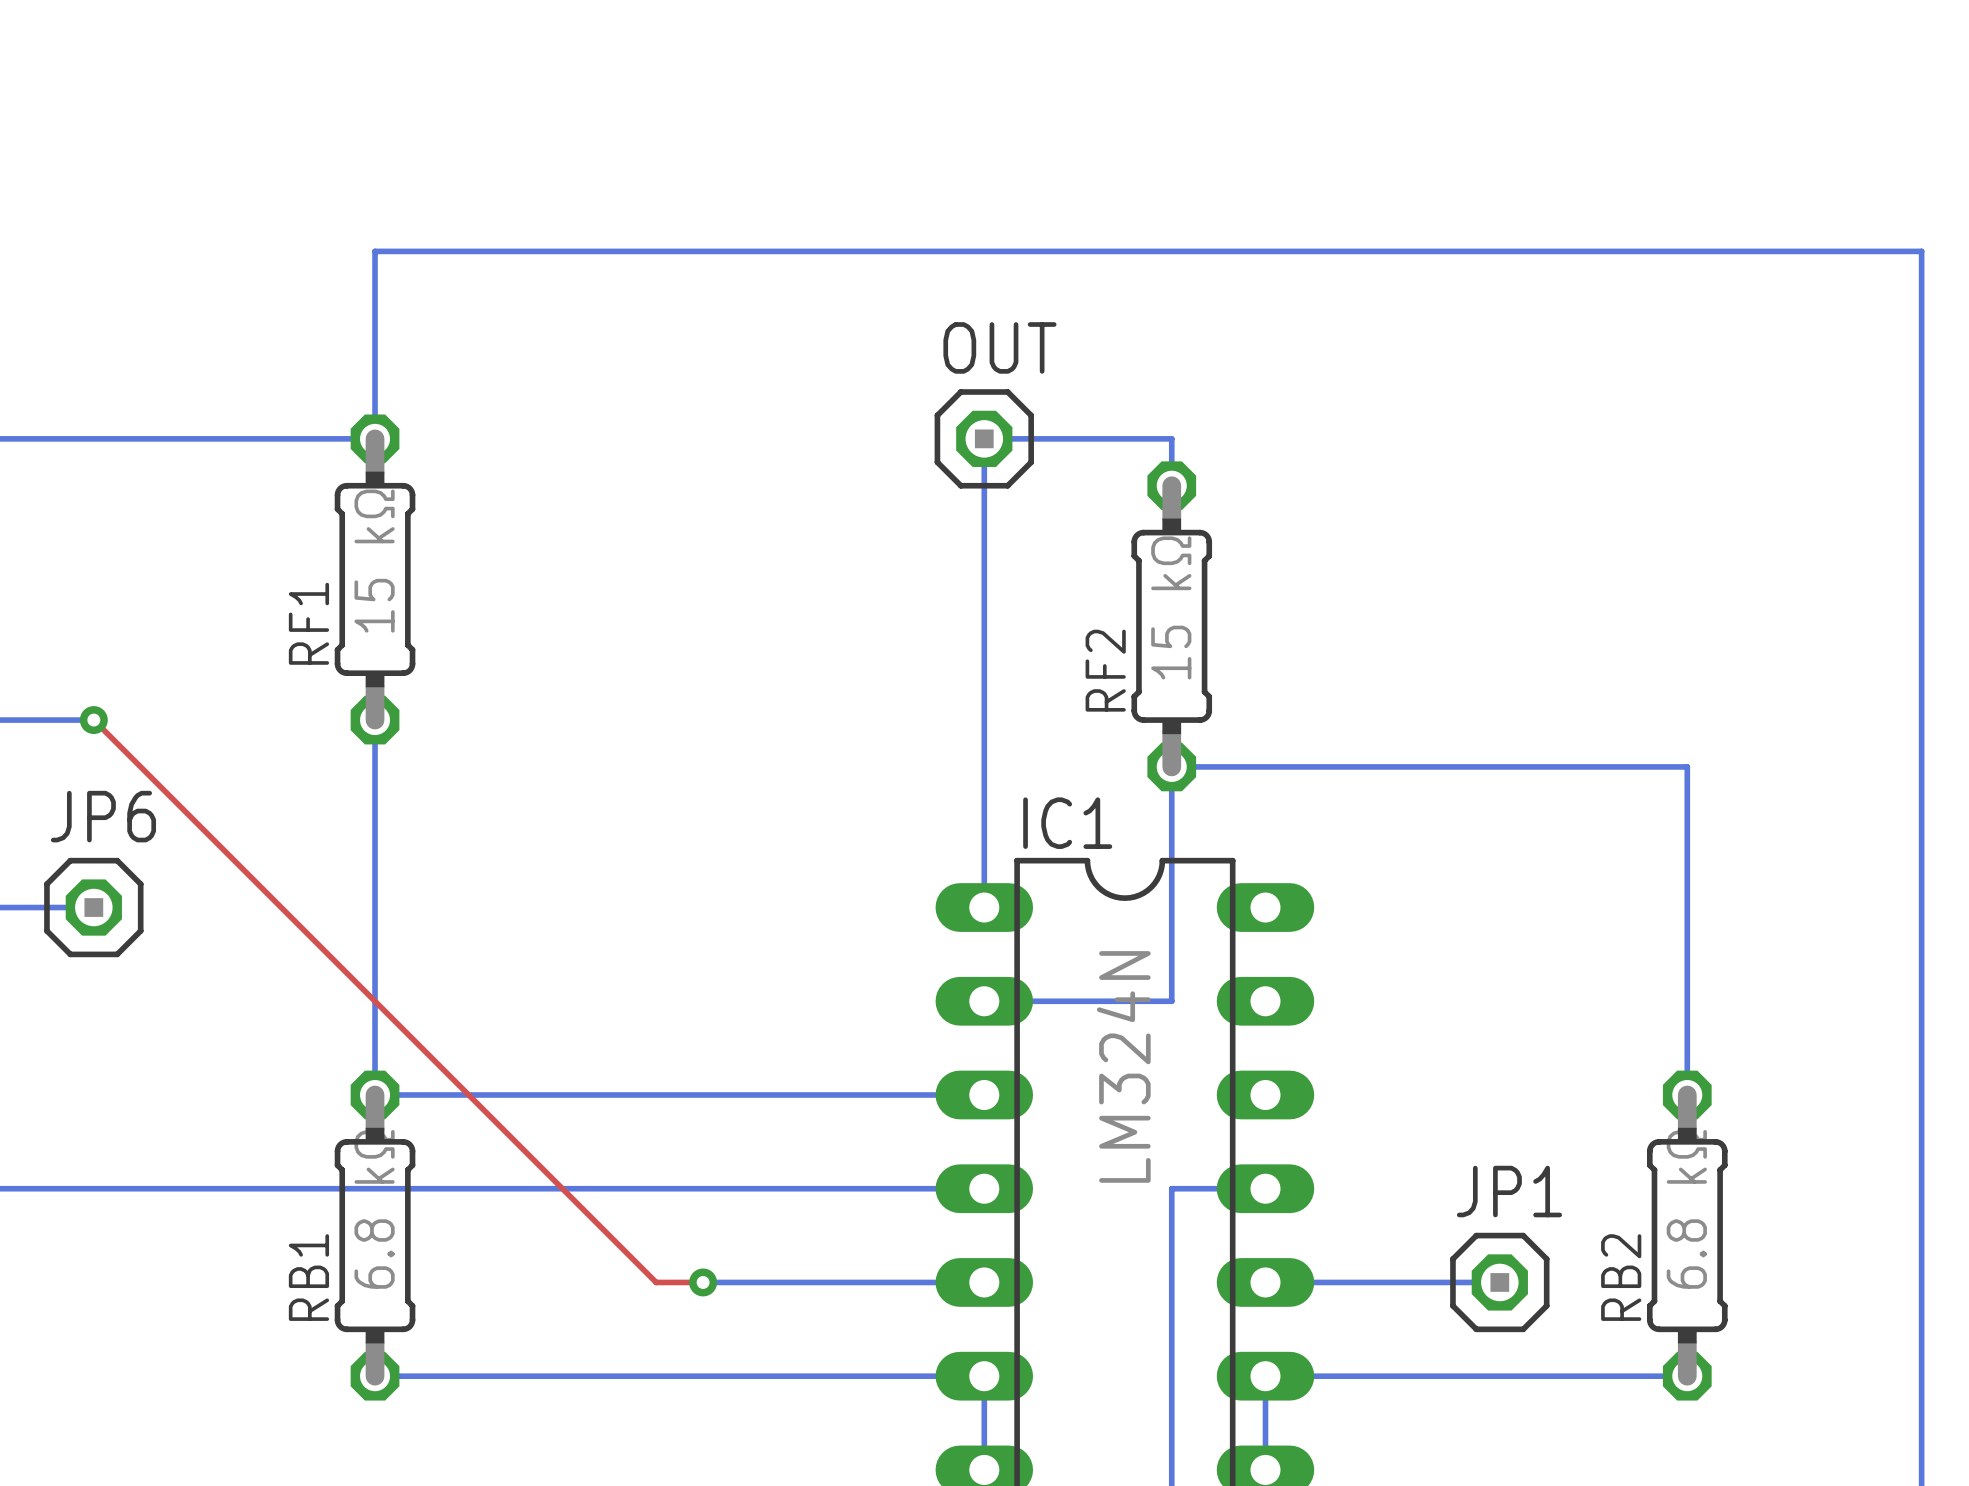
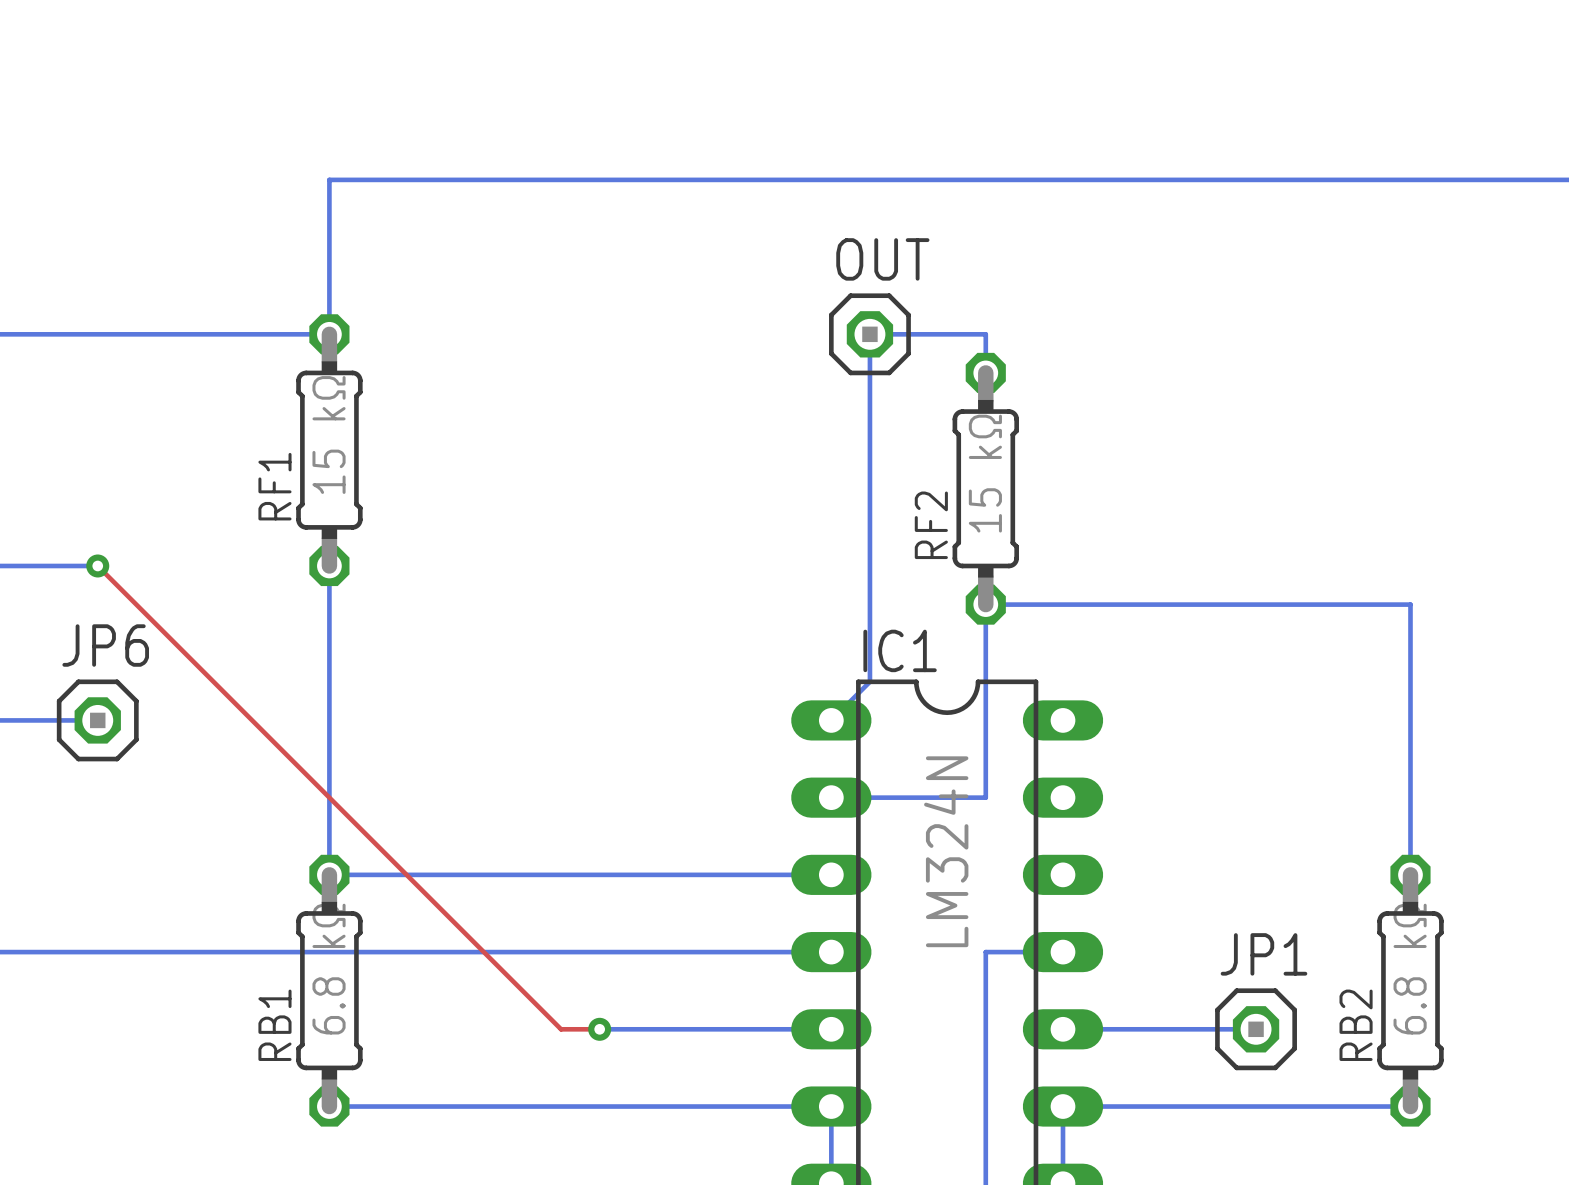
OUT position: (984, 438) -> (869, 334)
bottom track: (1031, 438) (984, 438) (984, 907) -> (869, 334) (869, 681) (831, 720)

